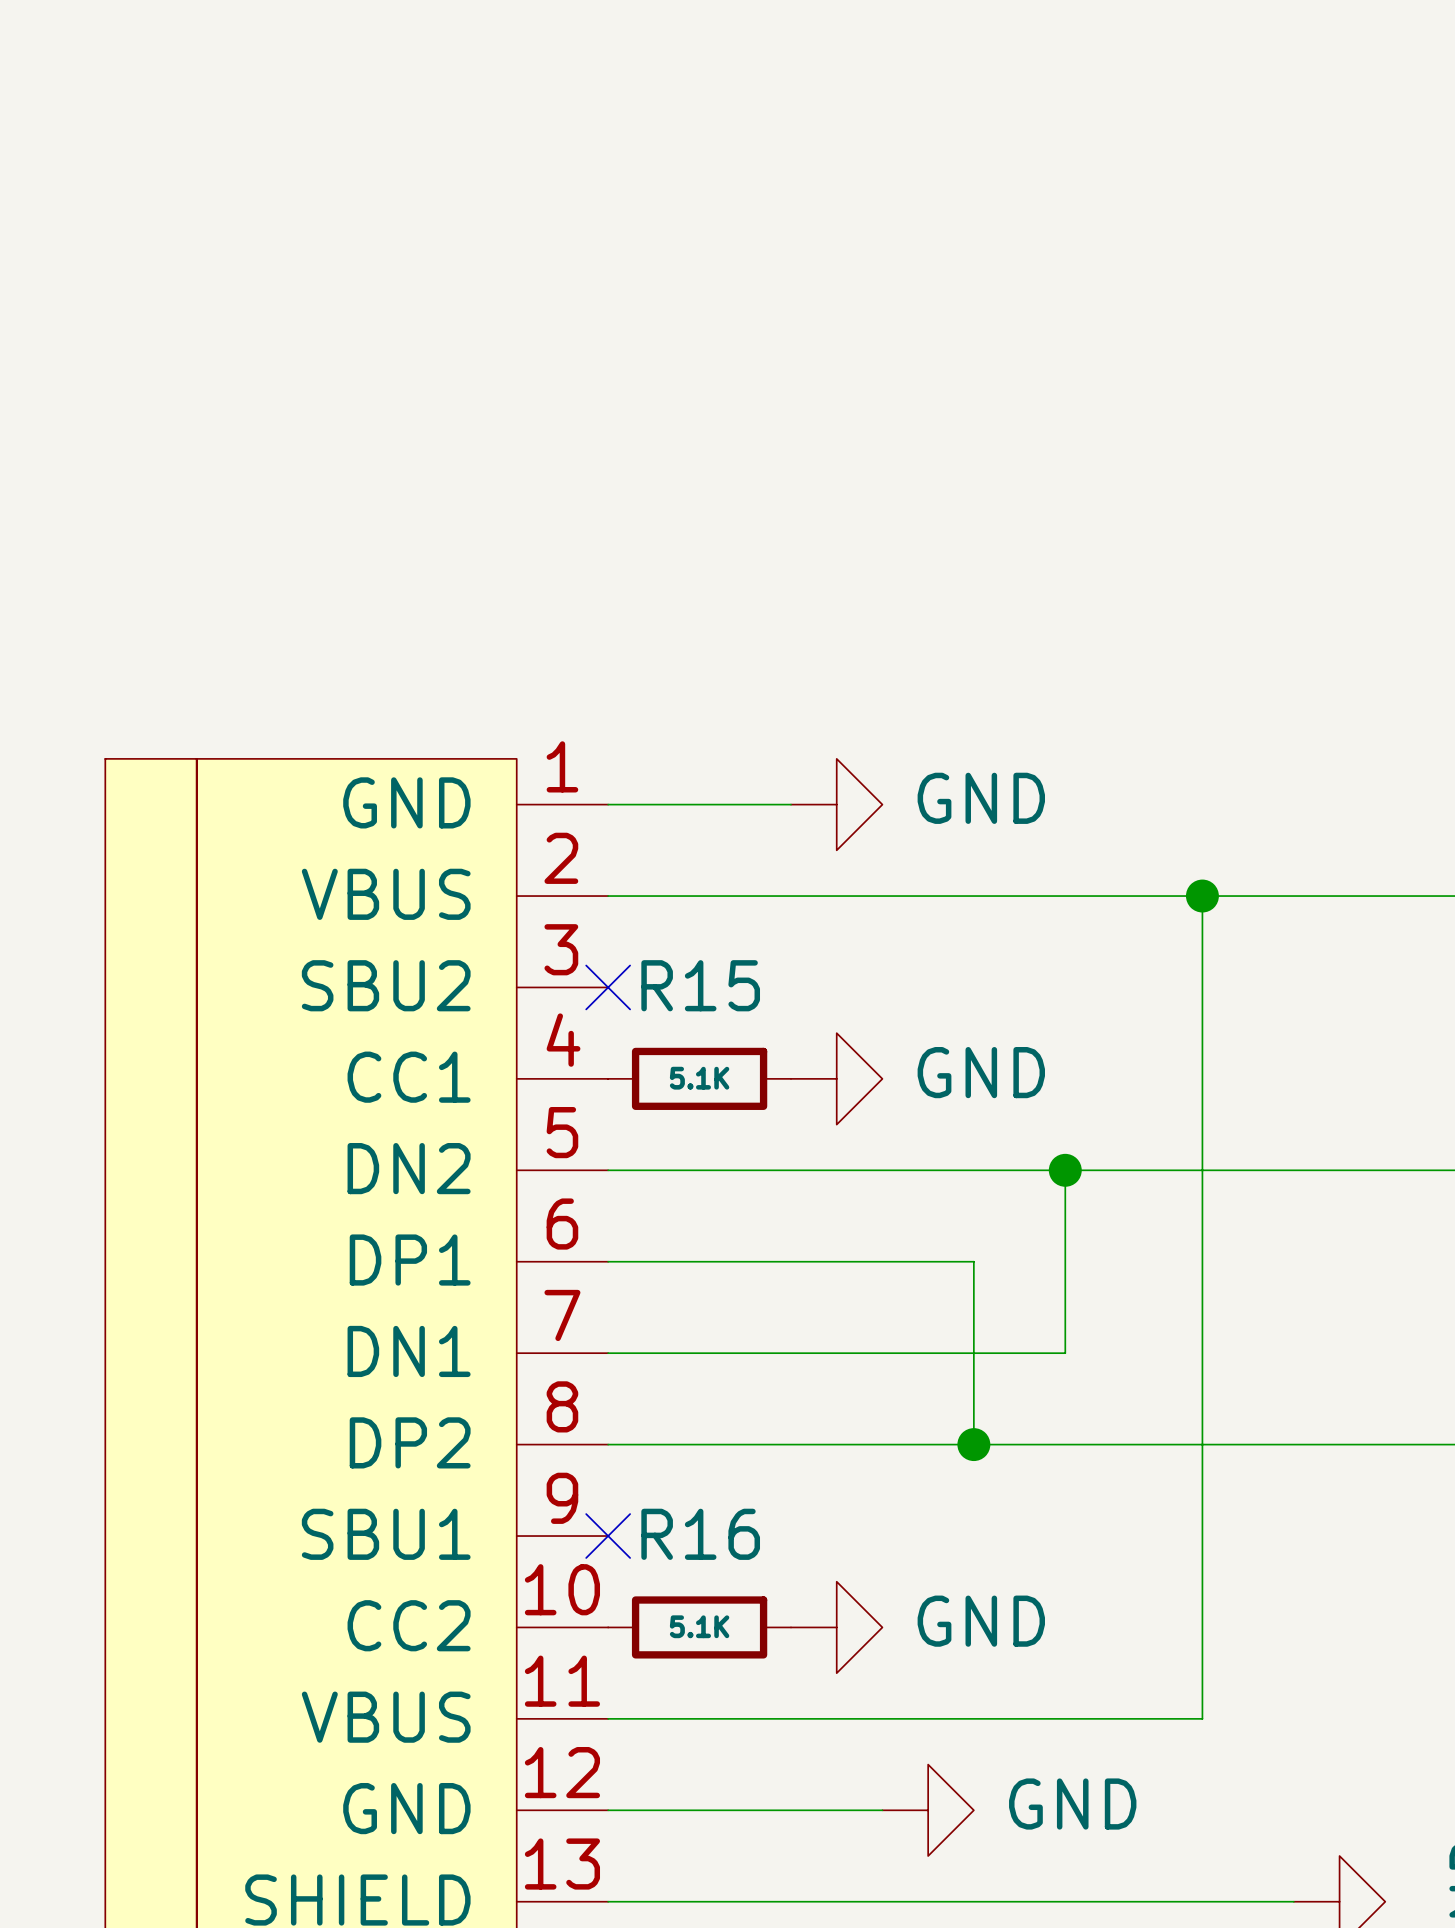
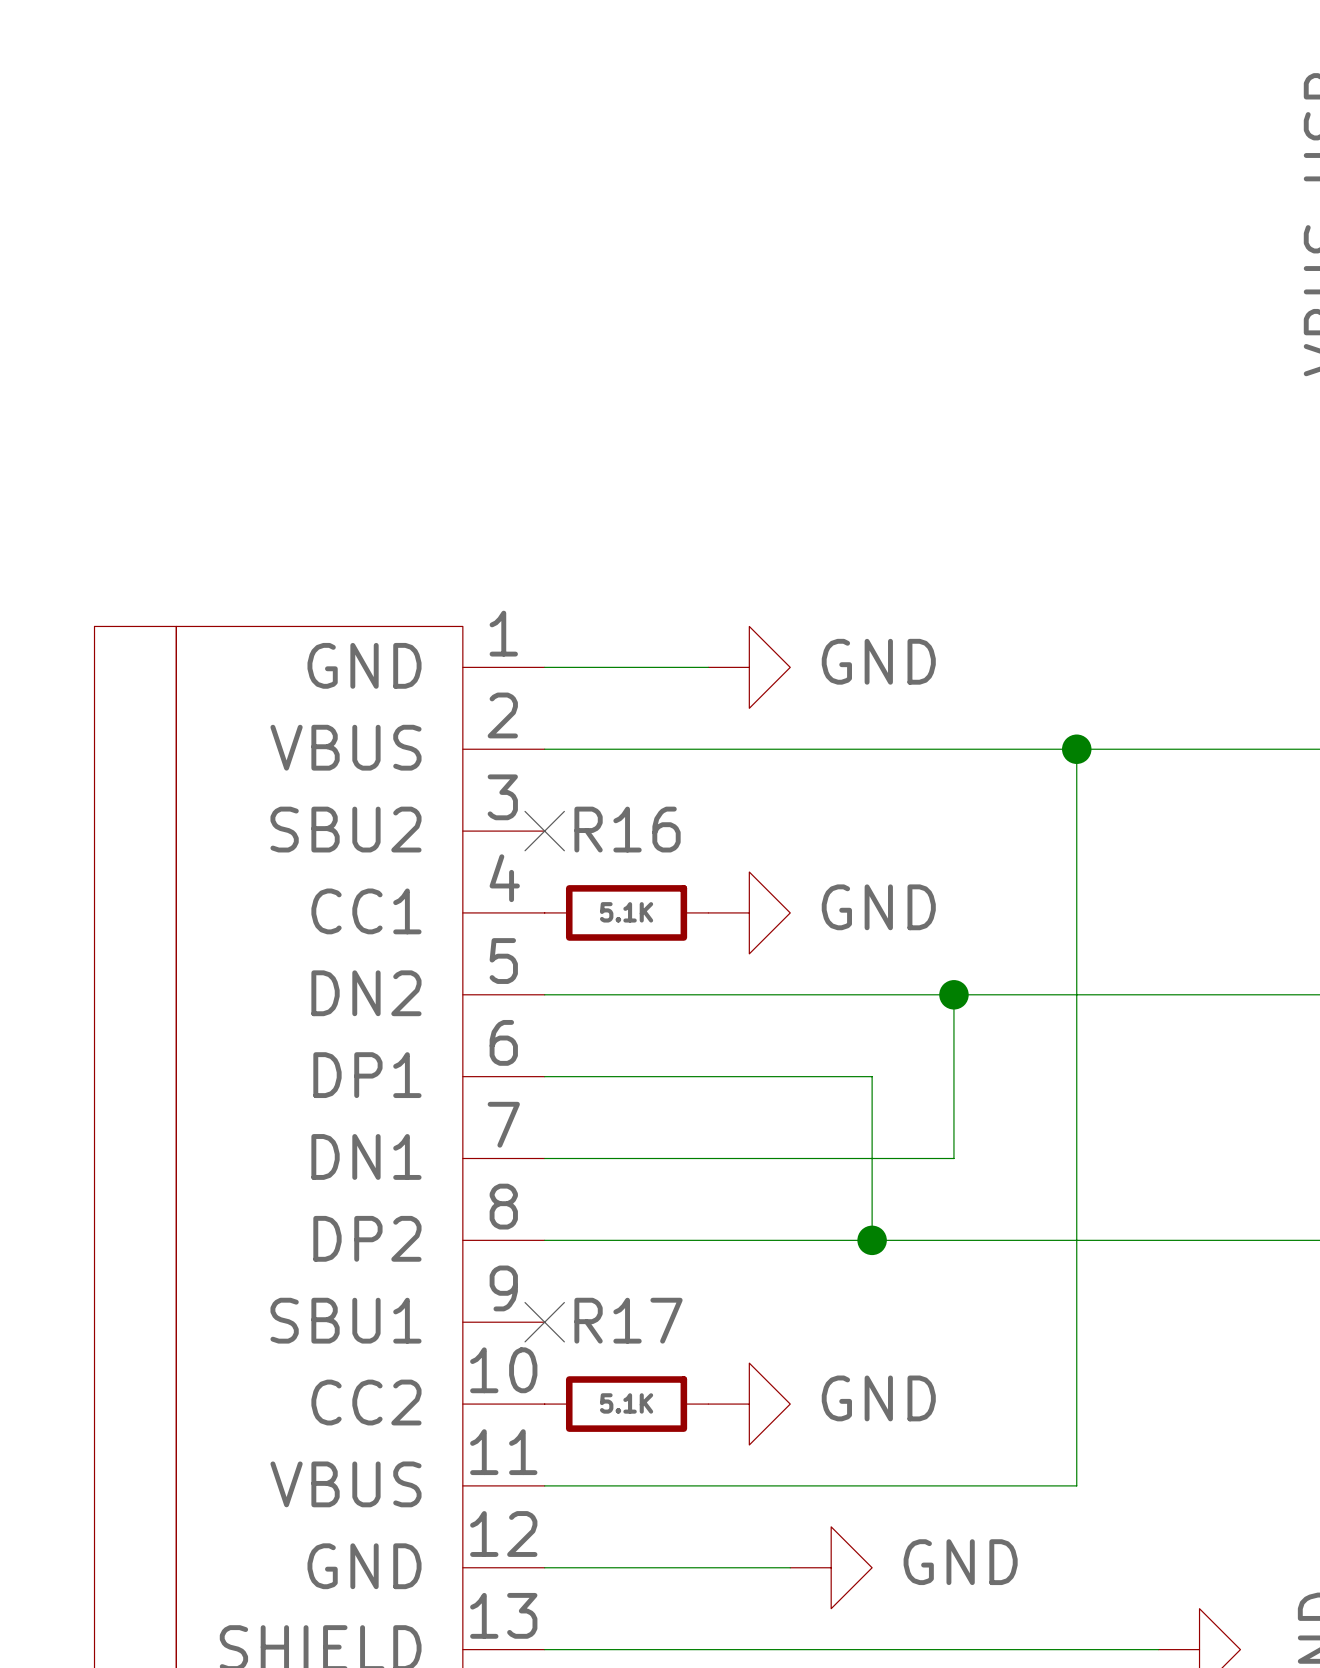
R15 name: R15 (700, 985) -> R16 (627, 829)
R16 name: R16 (700, 1534) -> R17 (628, 1320)

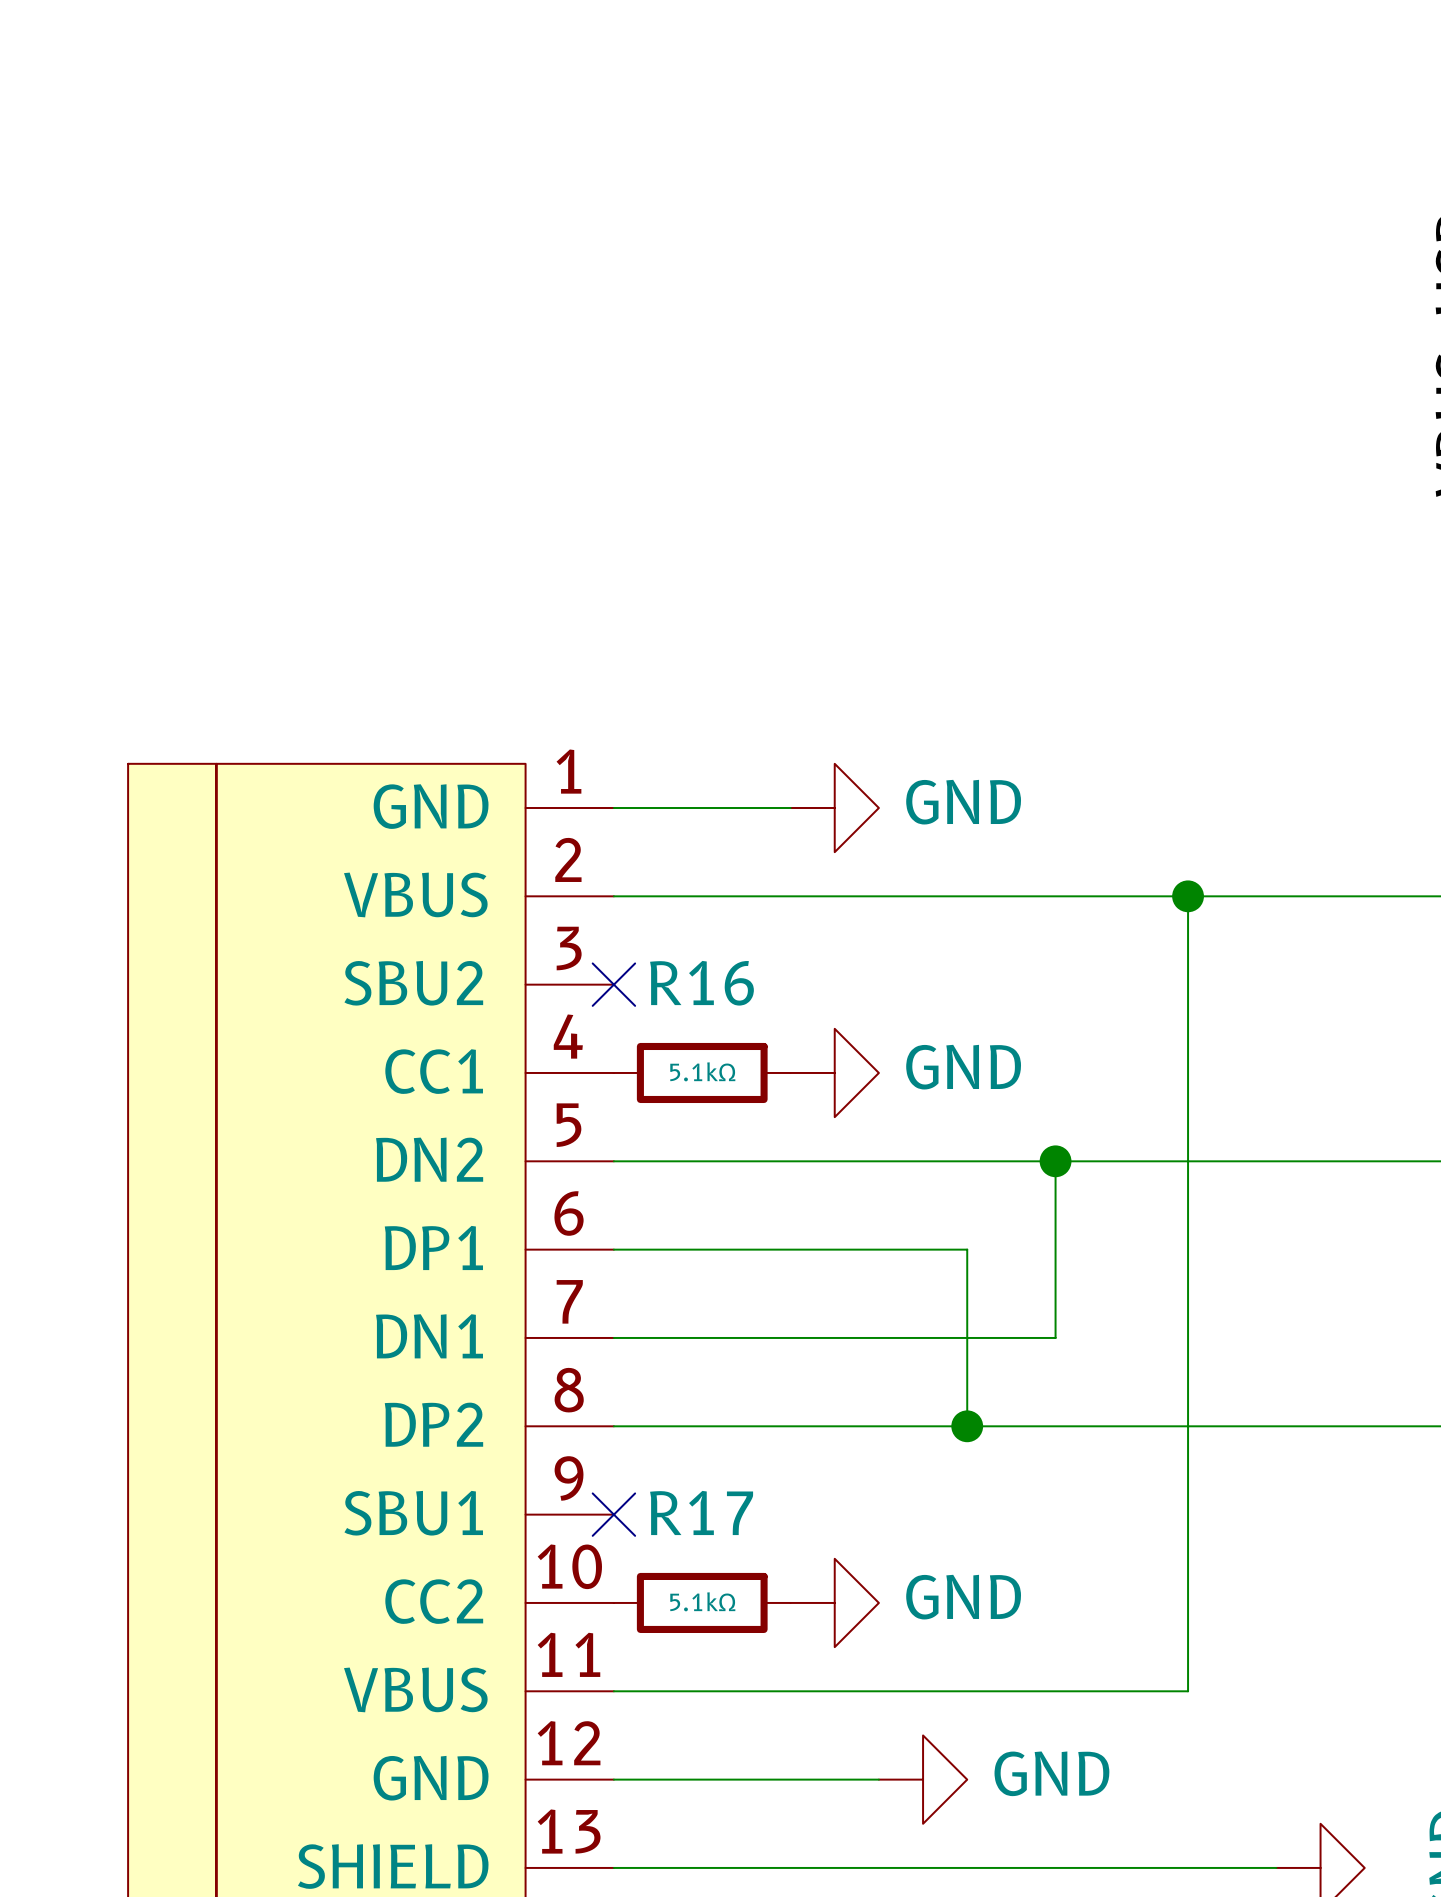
R16 value: 5.1K (626, 912) -> 5.1kΩ (702, 1071)
R17 value: 5.1K (626, 1403) -> 5.1kΩ (702, 1601)

